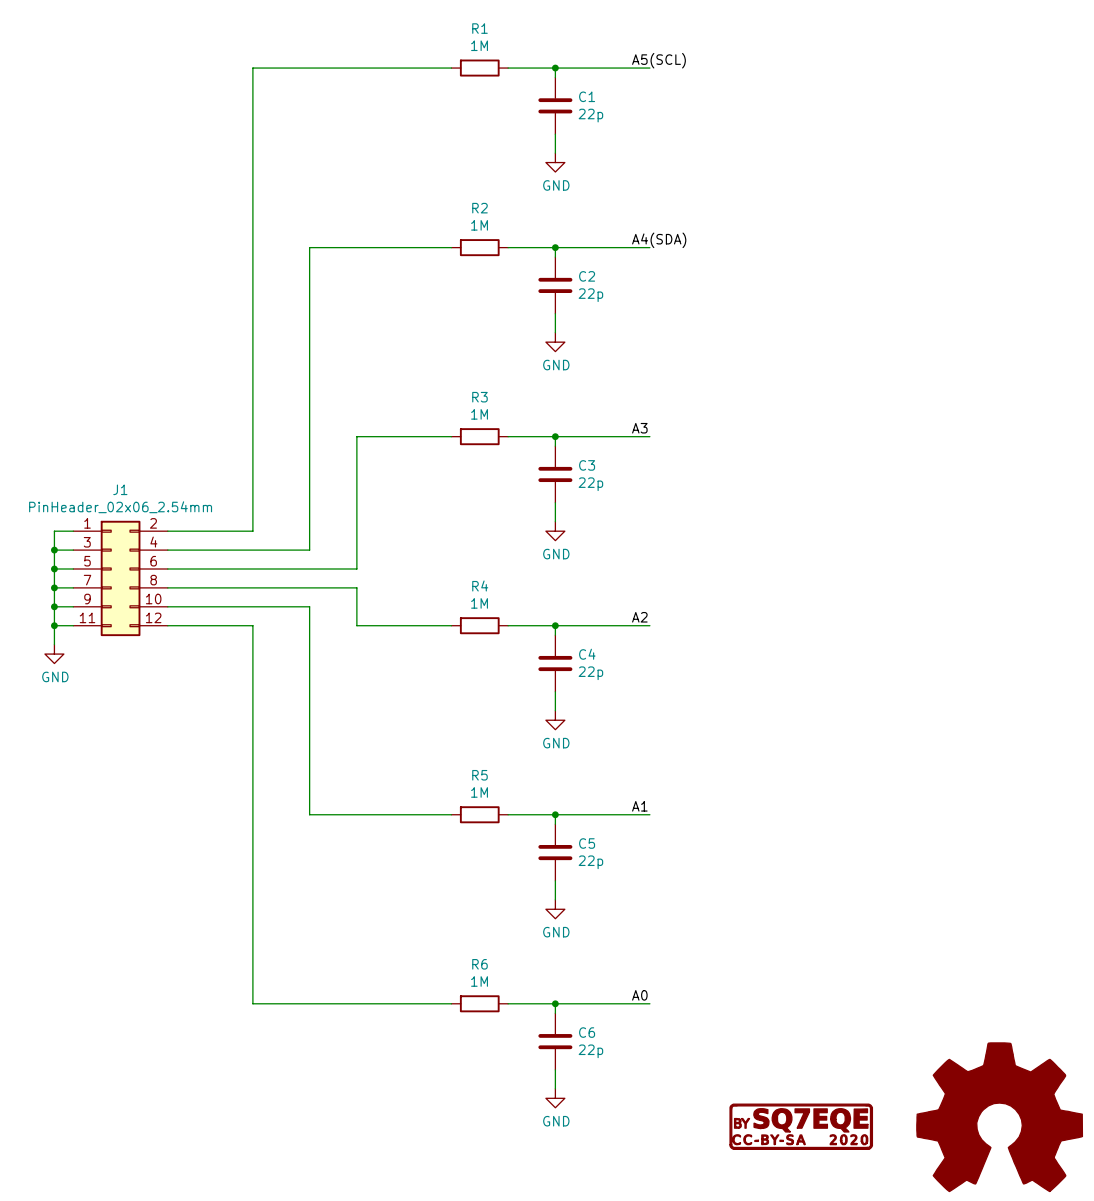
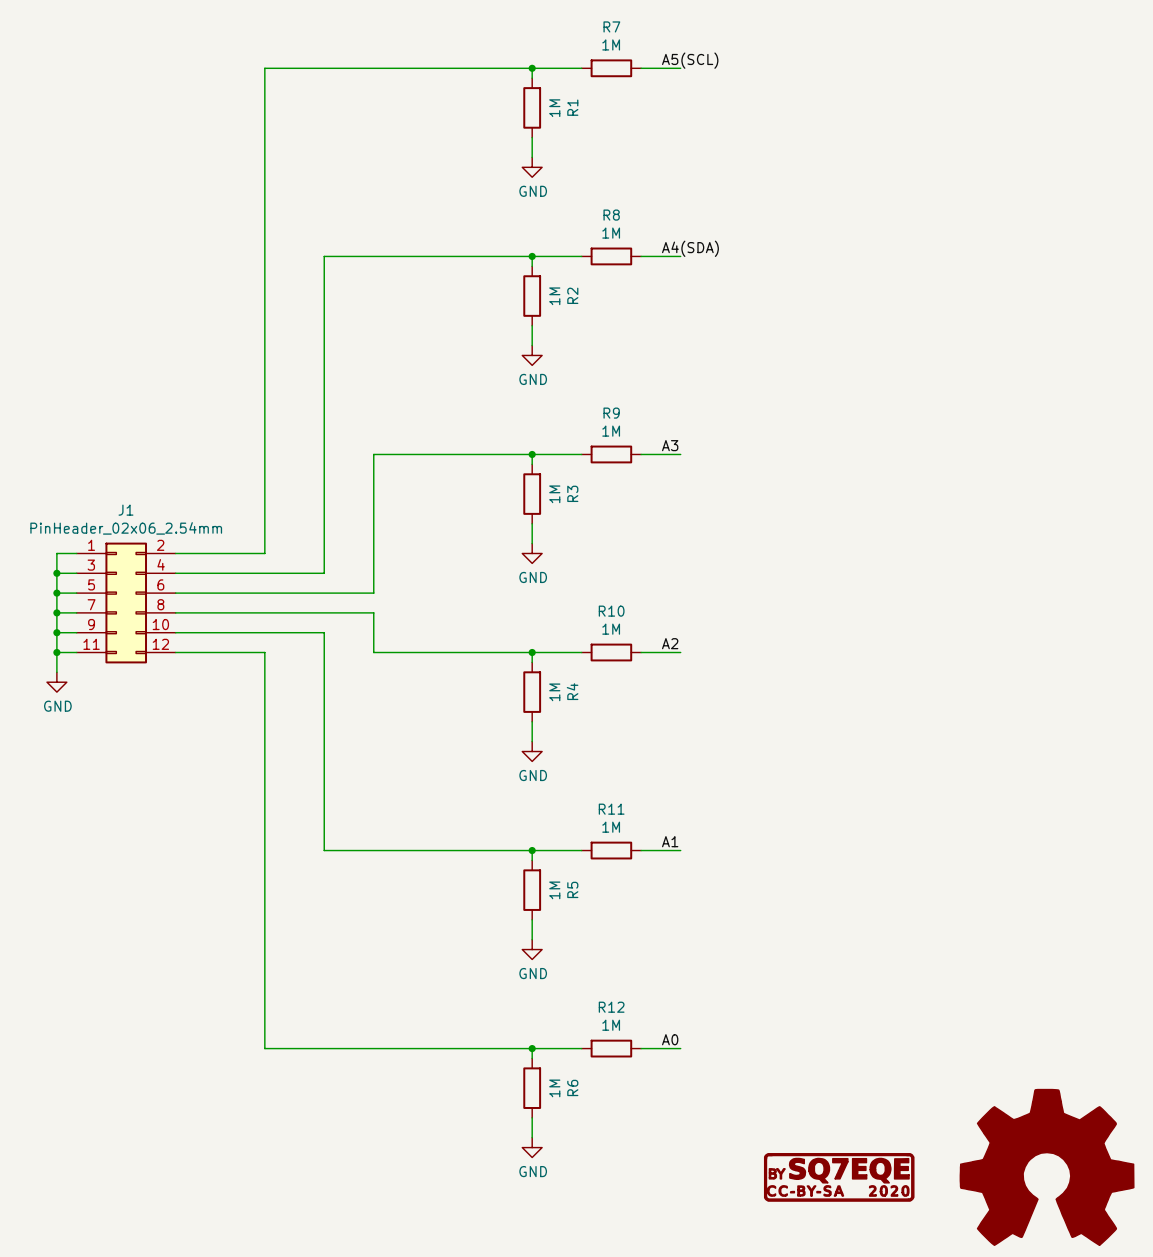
wire: none -> (472, 68) (532, 68) (532, 78)
R1 rotation: 0° (479, 68) -> 90° clockwise (532, 107)
R1 position: (479, 68) -> (532, 107)
junction: none -> (532, 68)
junction: (555, 68) -> none
R7: none -> 1M (611, 68)
wire: (612, 68) (555, 68) (555, 77) -> none
C1: 22p (555, 105) -> none
wire: (555, 134) (555, 153) -> (532, 137) (532, 157)
power symbol position: GND (555, 162) -> GND (532, 167)
wire: none -> (472, 256) (532, 256) (532, 266)
R2 rotation: 0° (479, 247) -> 90° clockwise (532, 296)
R2 position: (479, 247) -> (532, 296)
junction: none -> (532, 256)
junction: (555, 247) -> none
R8: none -> 1M (611, 256)
wire: (612, 247) (555, 247) (555, 257) -> none
C2: 22p (555, 285) -> none
wire: (555, 313) (555, 332) -> (532, 325) (532, 345)
power symbol position: GND (555, 342) -> GND (532, 355)
wire: none -> (472, 454) (532, 454) (532, 464)
R3 rotation: 0° (479, 436) -> 90° clockwise (532, 494)
R3 position: (479, 436) -> (532, 494)
junction: none -> (532, 454)
junction: (555, 436) -> none
R9: none -> 1M (611, 454)
wire: (612, 436) (555, 436) (555, 446) -> none
C3: 22p (555, 474) -> none
wire: (555, 502) (555, 521) -> (532, 523) (532, 543)
power symbol position: GND (555, 531) -> GND (532, 553)
wire: none -> (472, 652) (532, 652) (532, 662)
R4 rotation: 0° (479, 625) -> 90° clockwise (532, 692)
R4 position: (479, 625) -> (532, 692)
junction: none -> (532, 652)
junction: (555, 625) -> none
R10: none -> 1M (611, 652)
wire: (612, 625) (555, 625) (555, 635) -> none
C4: 22p (555, 663) -> none
wire: (555, 691) (555, 710) -> (532, 721) (532, 741)
power symbol position: GND (555, 720) -> GND (532, 751)
wire: none -> (472, 850) (532, 850) (532, 860)
R5 rotation: 0° (479, 814) -> 90° clockwise (532, 890)
R5 position: (479, 814) -> (532, 890)
junction: none -> (532, 850)
junction: (555, 814) -> none
R11: none -> 1M (611, 850)
wire: (612, 814) (555, 814) (555, 824) -> none
C5: 22p (555, 852) -> none
wire: (555, 880) (555, 899) -> (532, 919) (532, 939)
power symbol position: GND (555, 909) -> GND (532, 949)
wire: none -> (472, 1048) (532, 1048) (532, 1058)
R6 rotation: 0° (479, 1003) -> 90° clockwise (532, 1088)
R6 position: (479, 1003) -> (532, 1088)
junction: none -> (532, 1048)
junction: (555, 1003) -> none
R12: none -> 1M (611, 1048)
wire: (612, 1003) (555, 1003) (555, 1013) -> none
C6: 22p (555, 1041) -> none
wire: (555, 1069) (555, 1088) -> (532, 1117) (532, 1137)
power symbol position: GND (555, 1098) -> GND (532, 1147)

